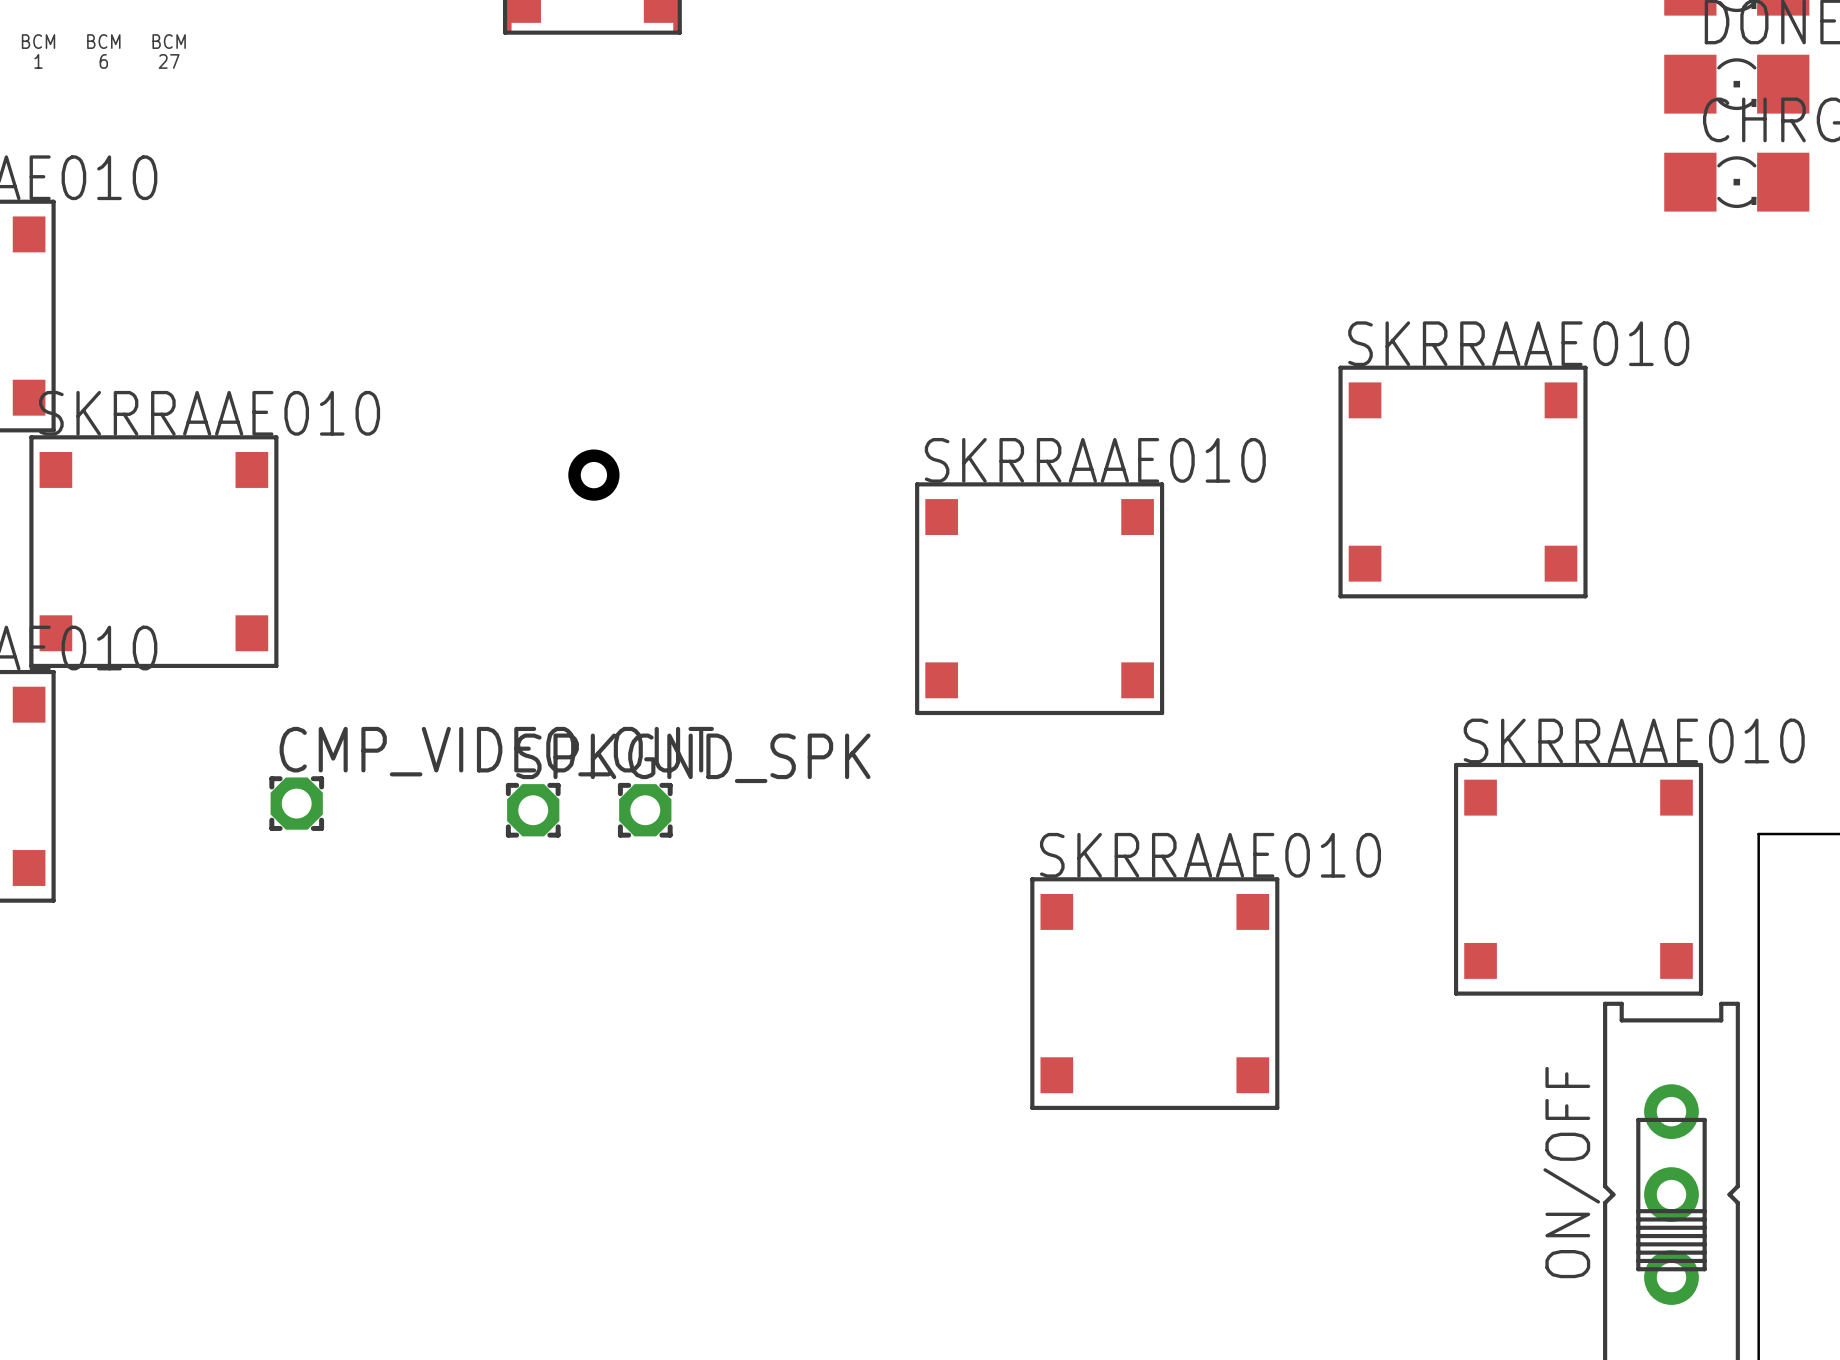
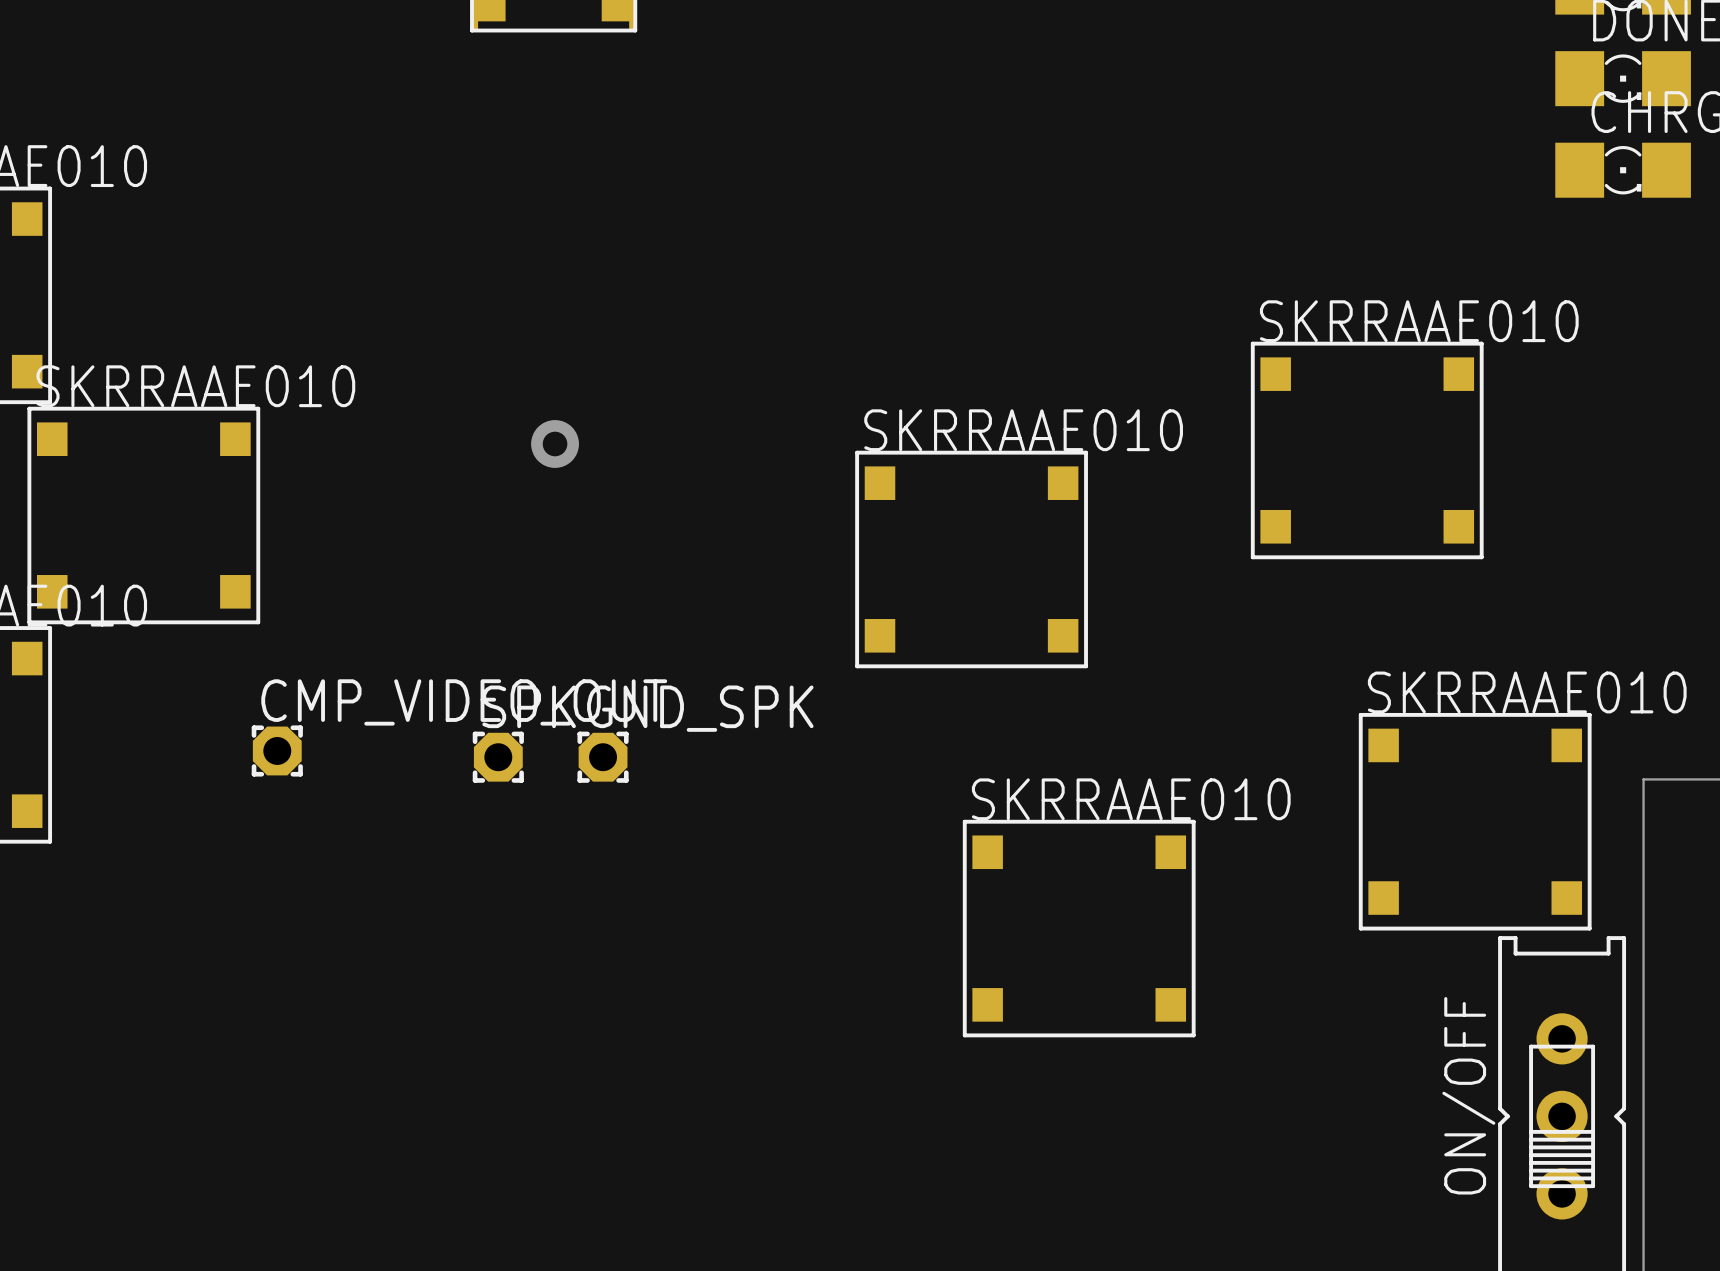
text: BCM (38, 41) -> none
text: BCM (103, 41) -> none
text: BCM (169, 41) -> none
text: 1 (38, 61) -> none
text: 6 (103, 61) -> none
text: 27 (169, 61) -> none

